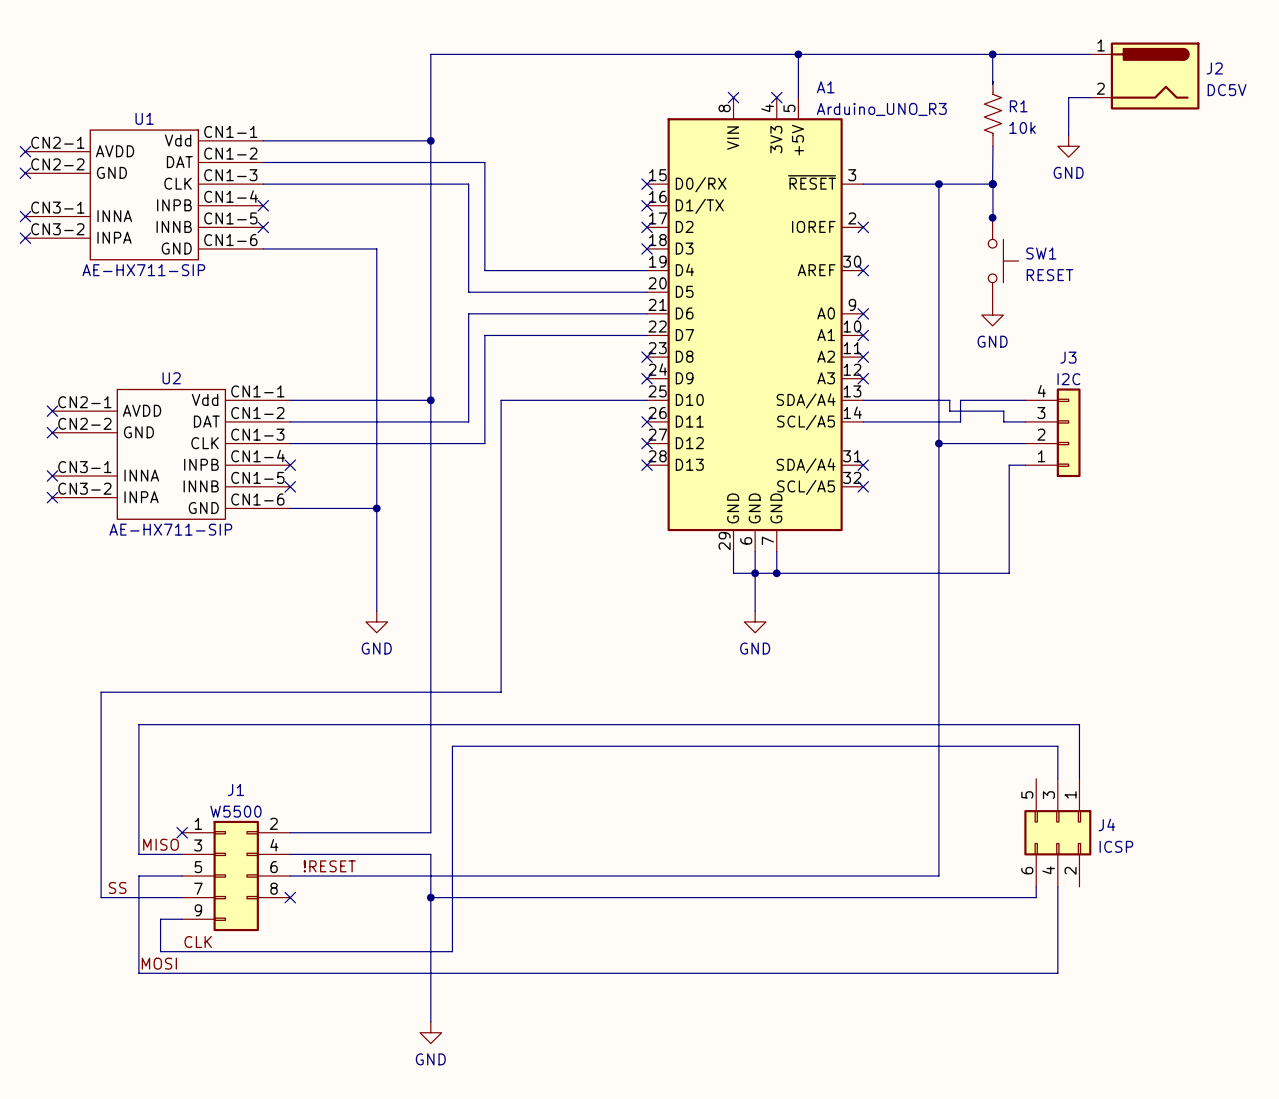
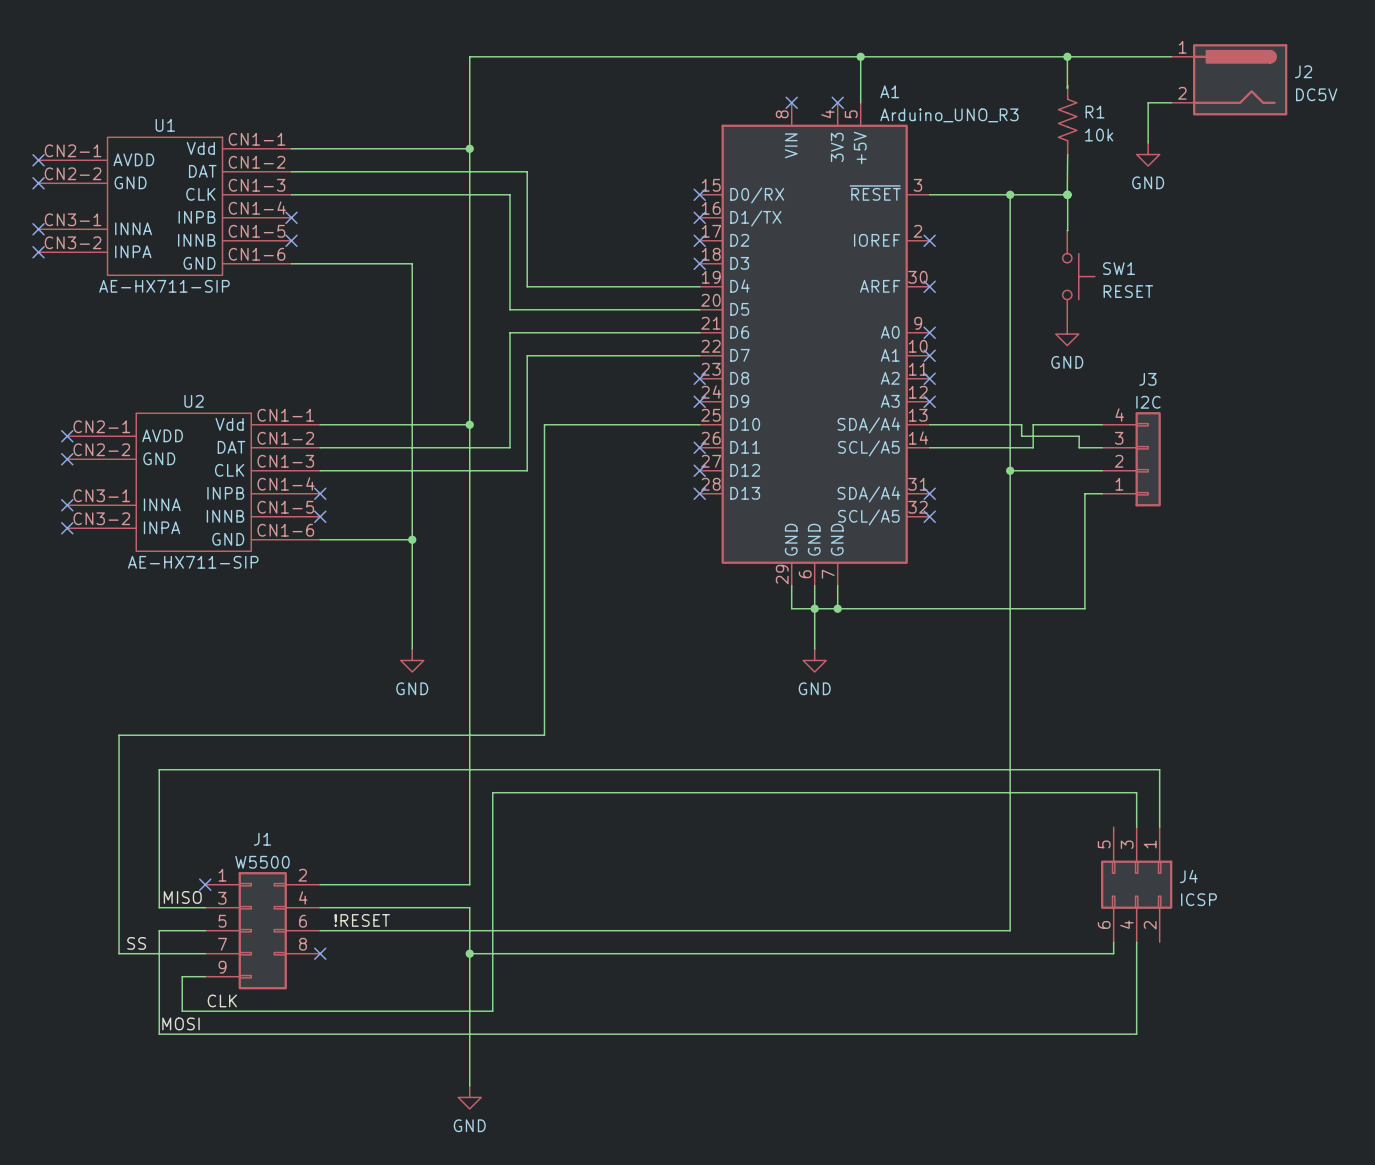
junction: (992, 217) -> none

